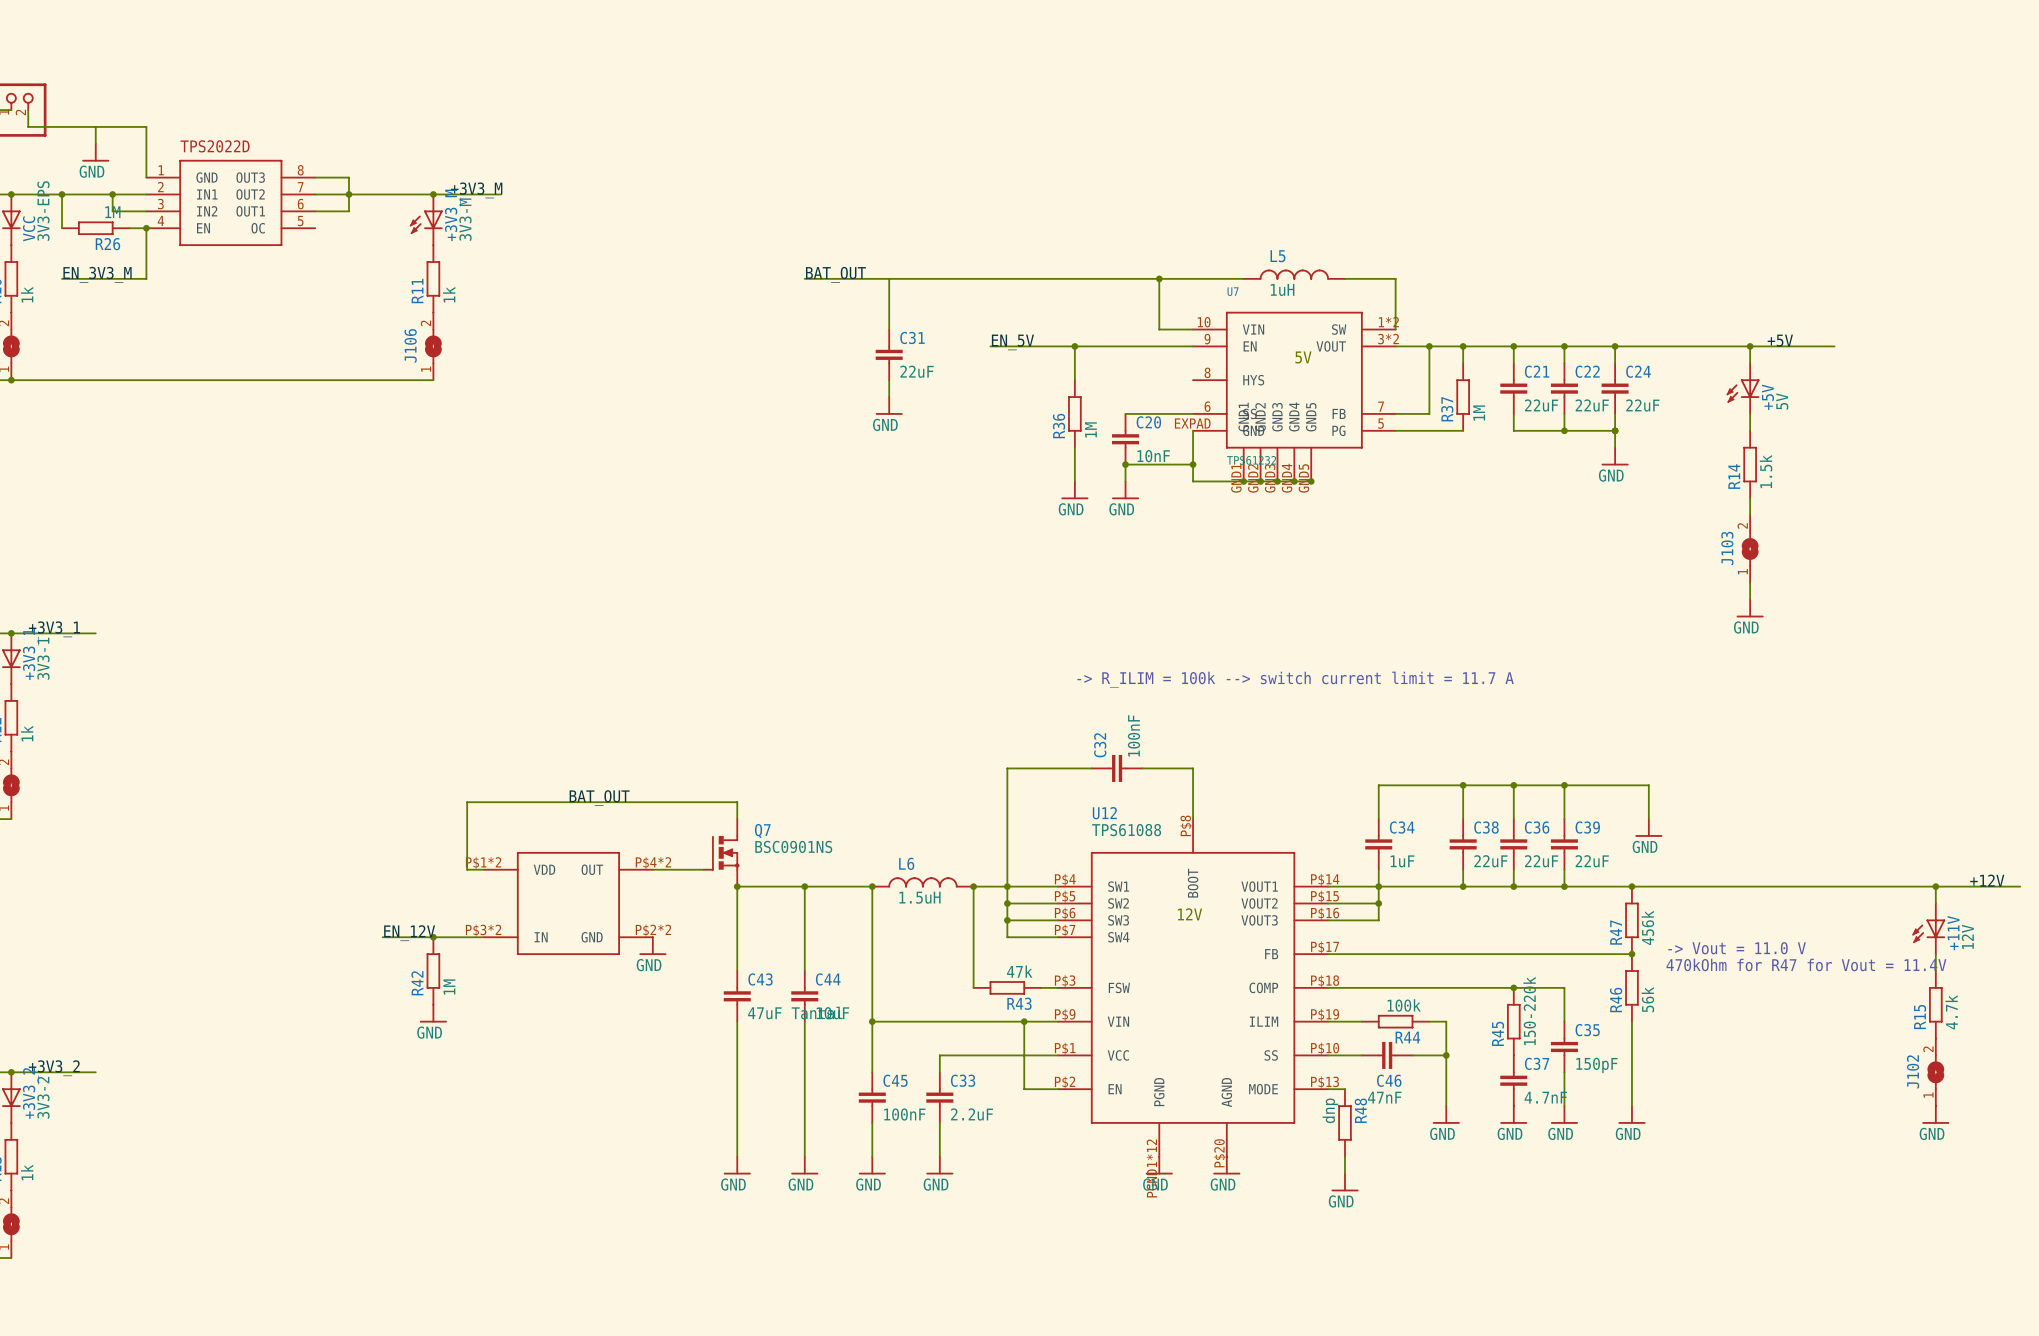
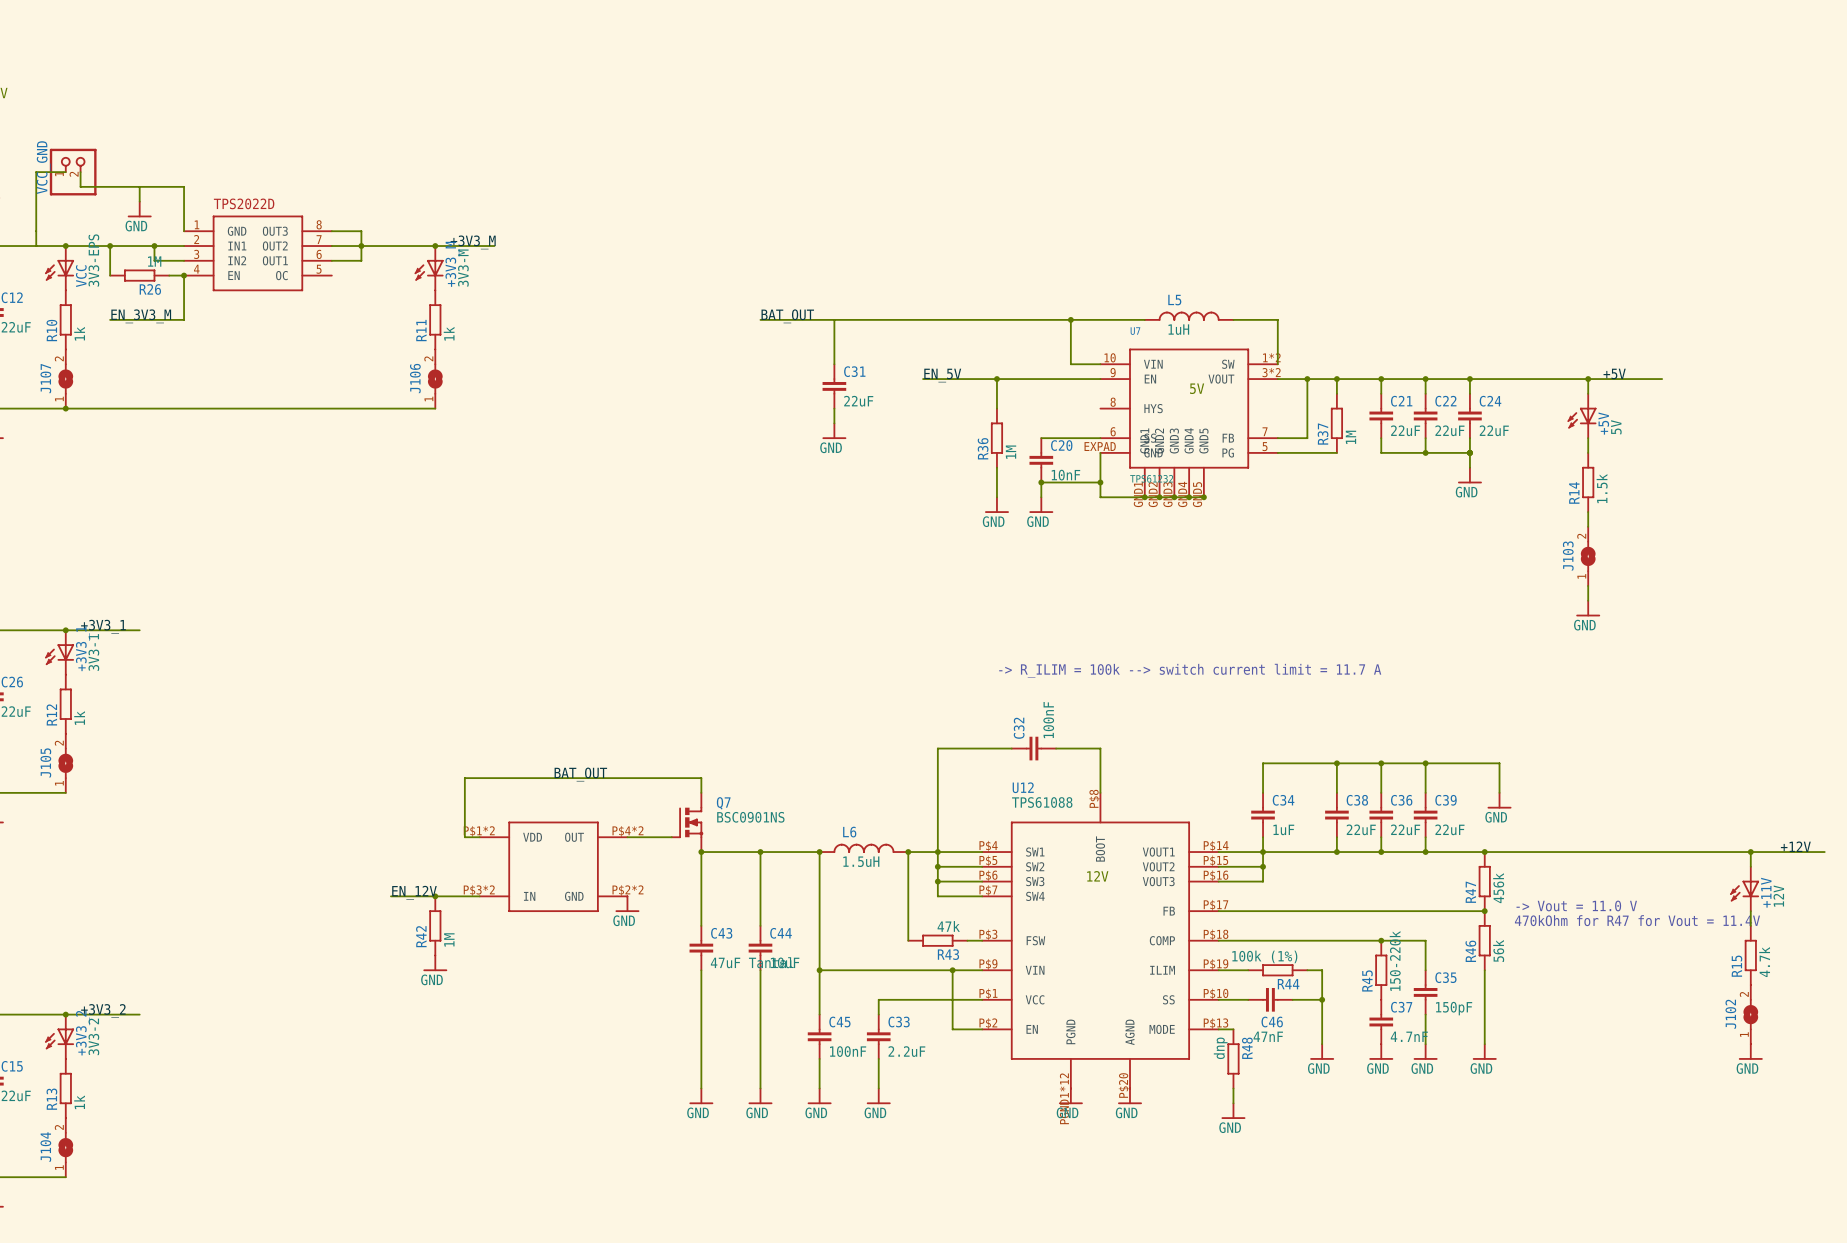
R44 value: 100k (1404, 1005) -> 100k (1%) (1264, 956)

